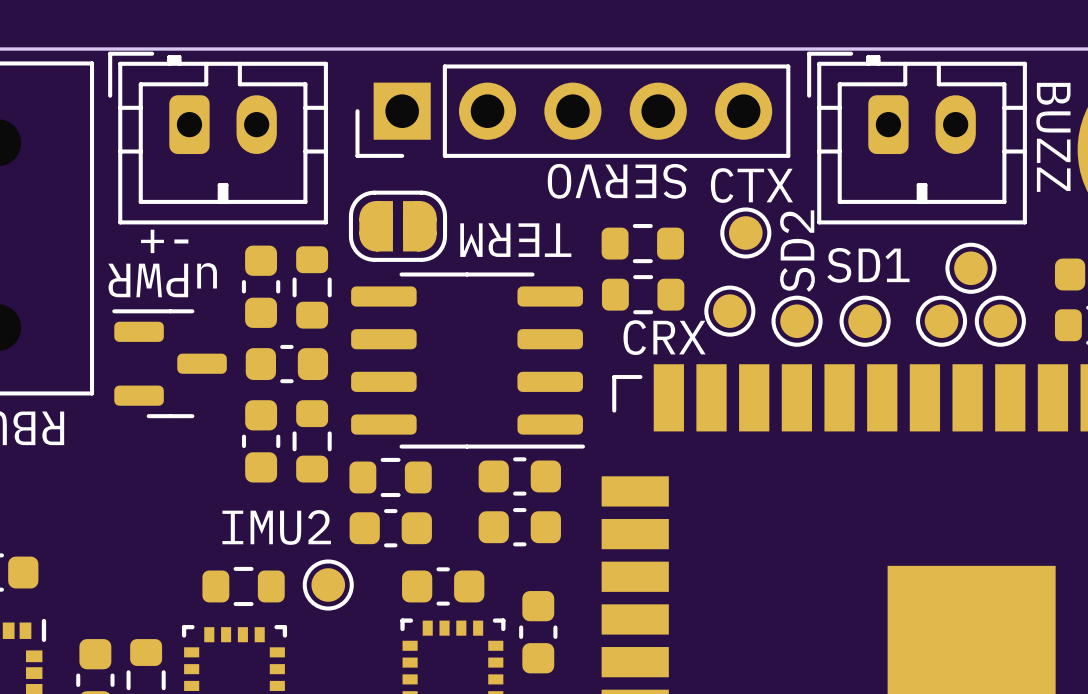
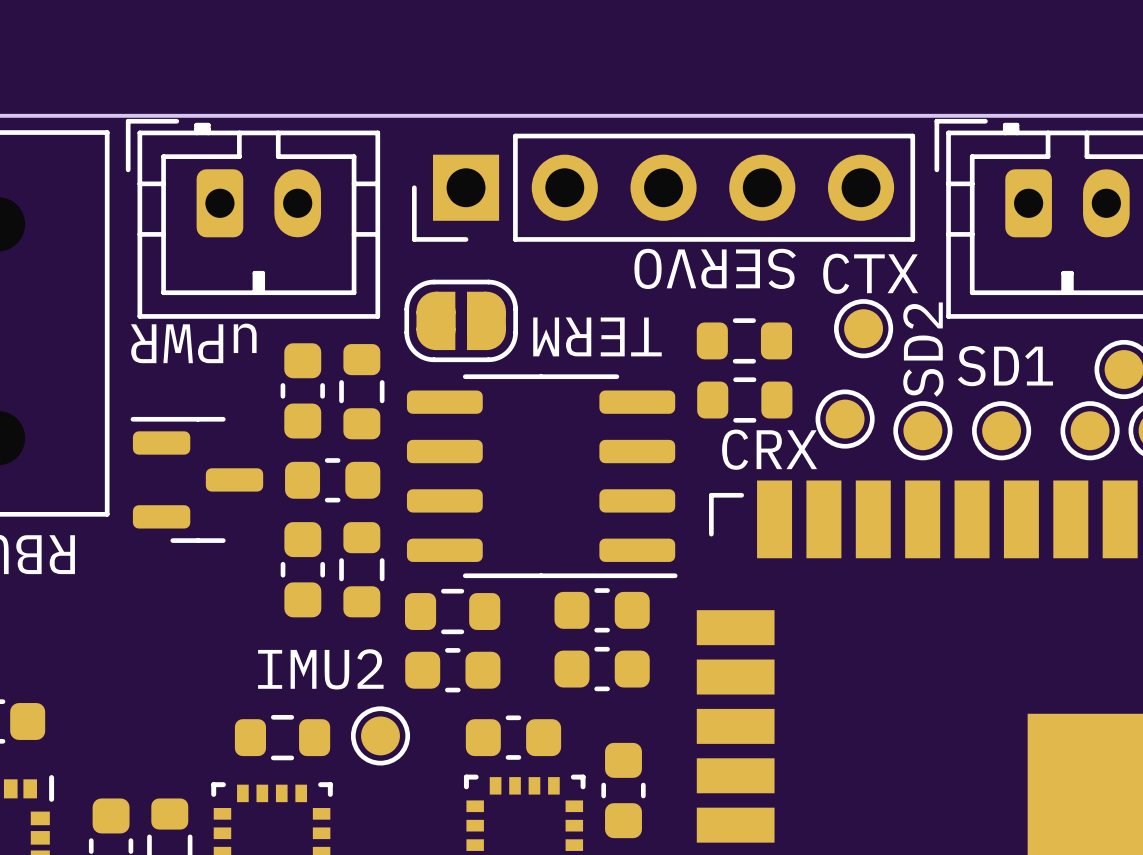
text: +- (164, 241) -> uPWR (193, 343)
text: uPWR (162, 280) -> none

